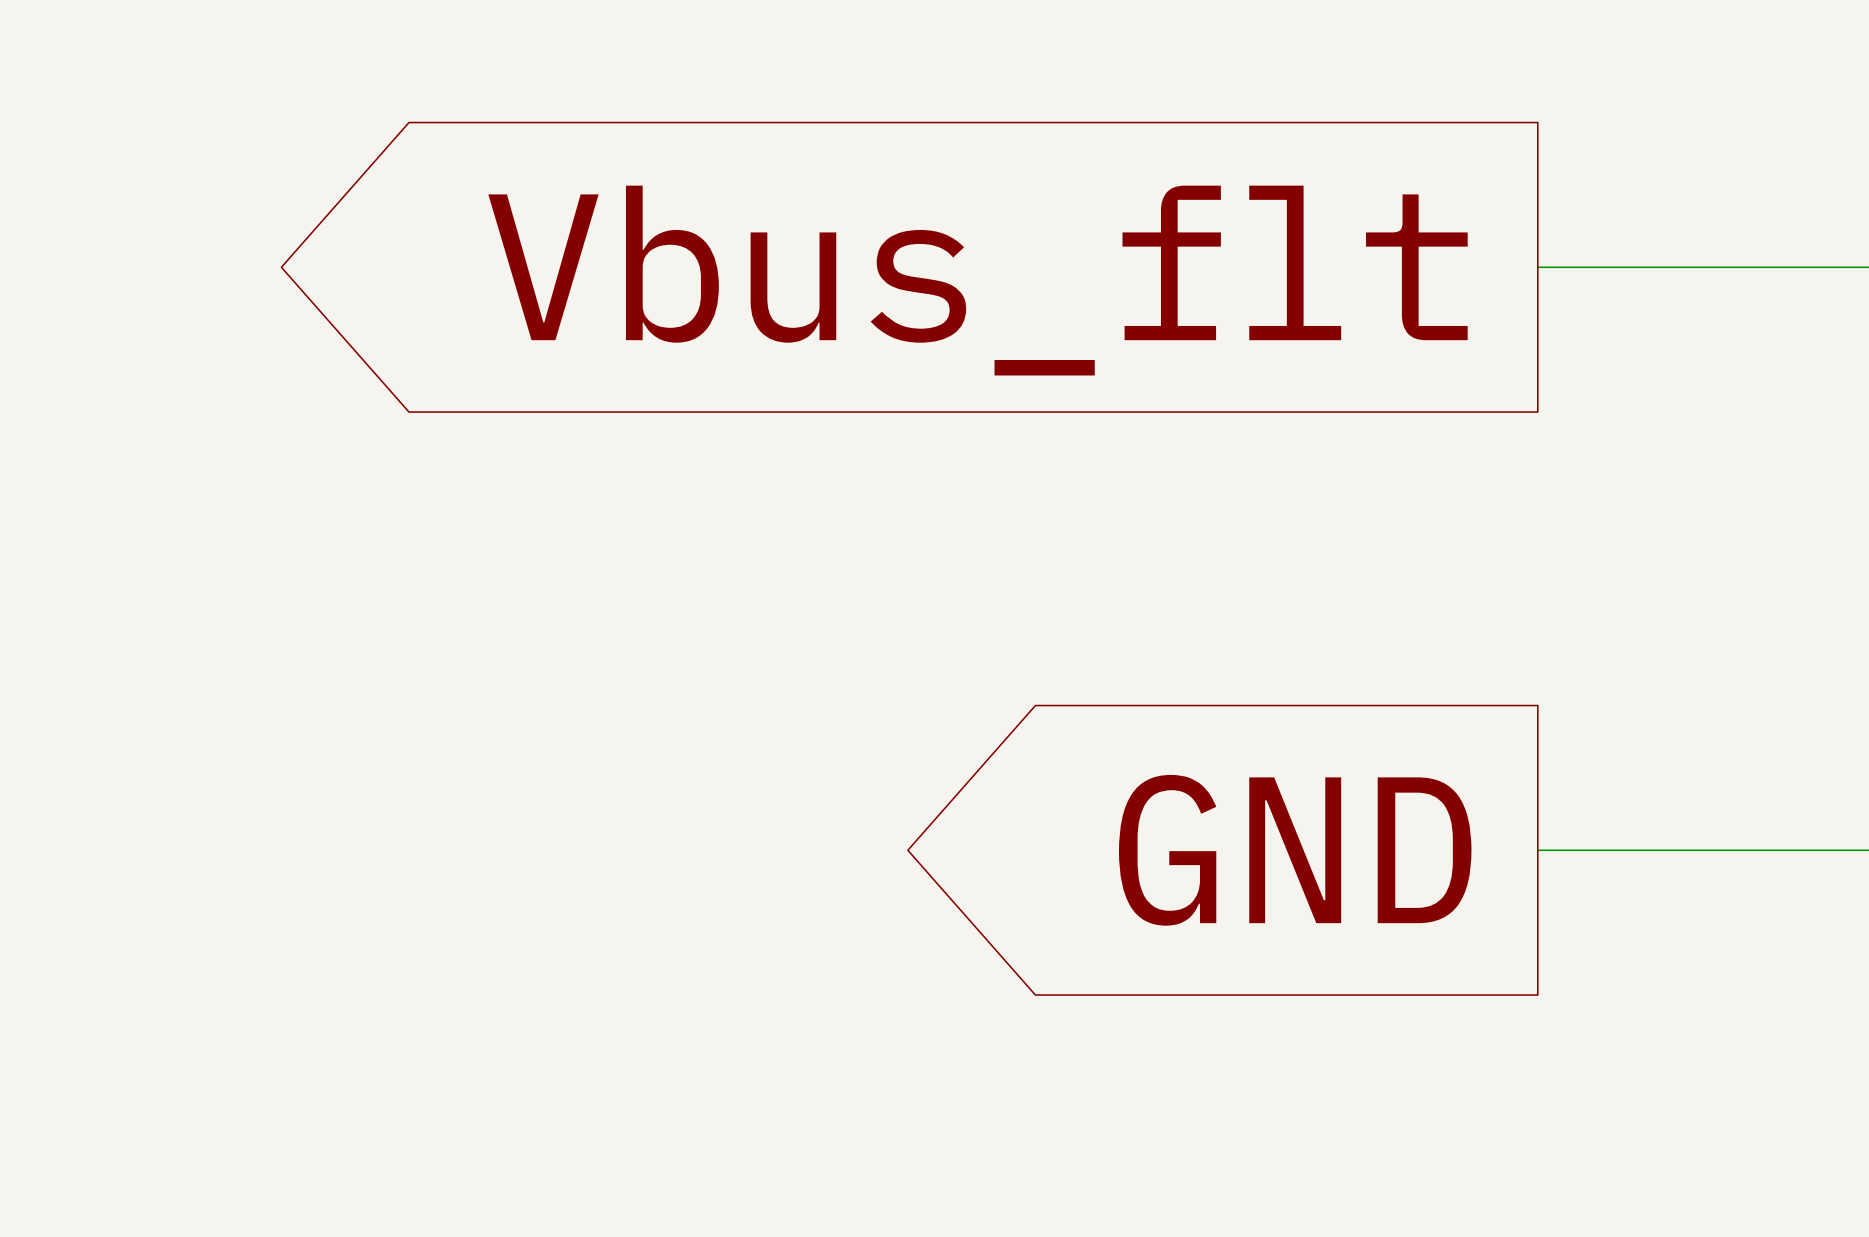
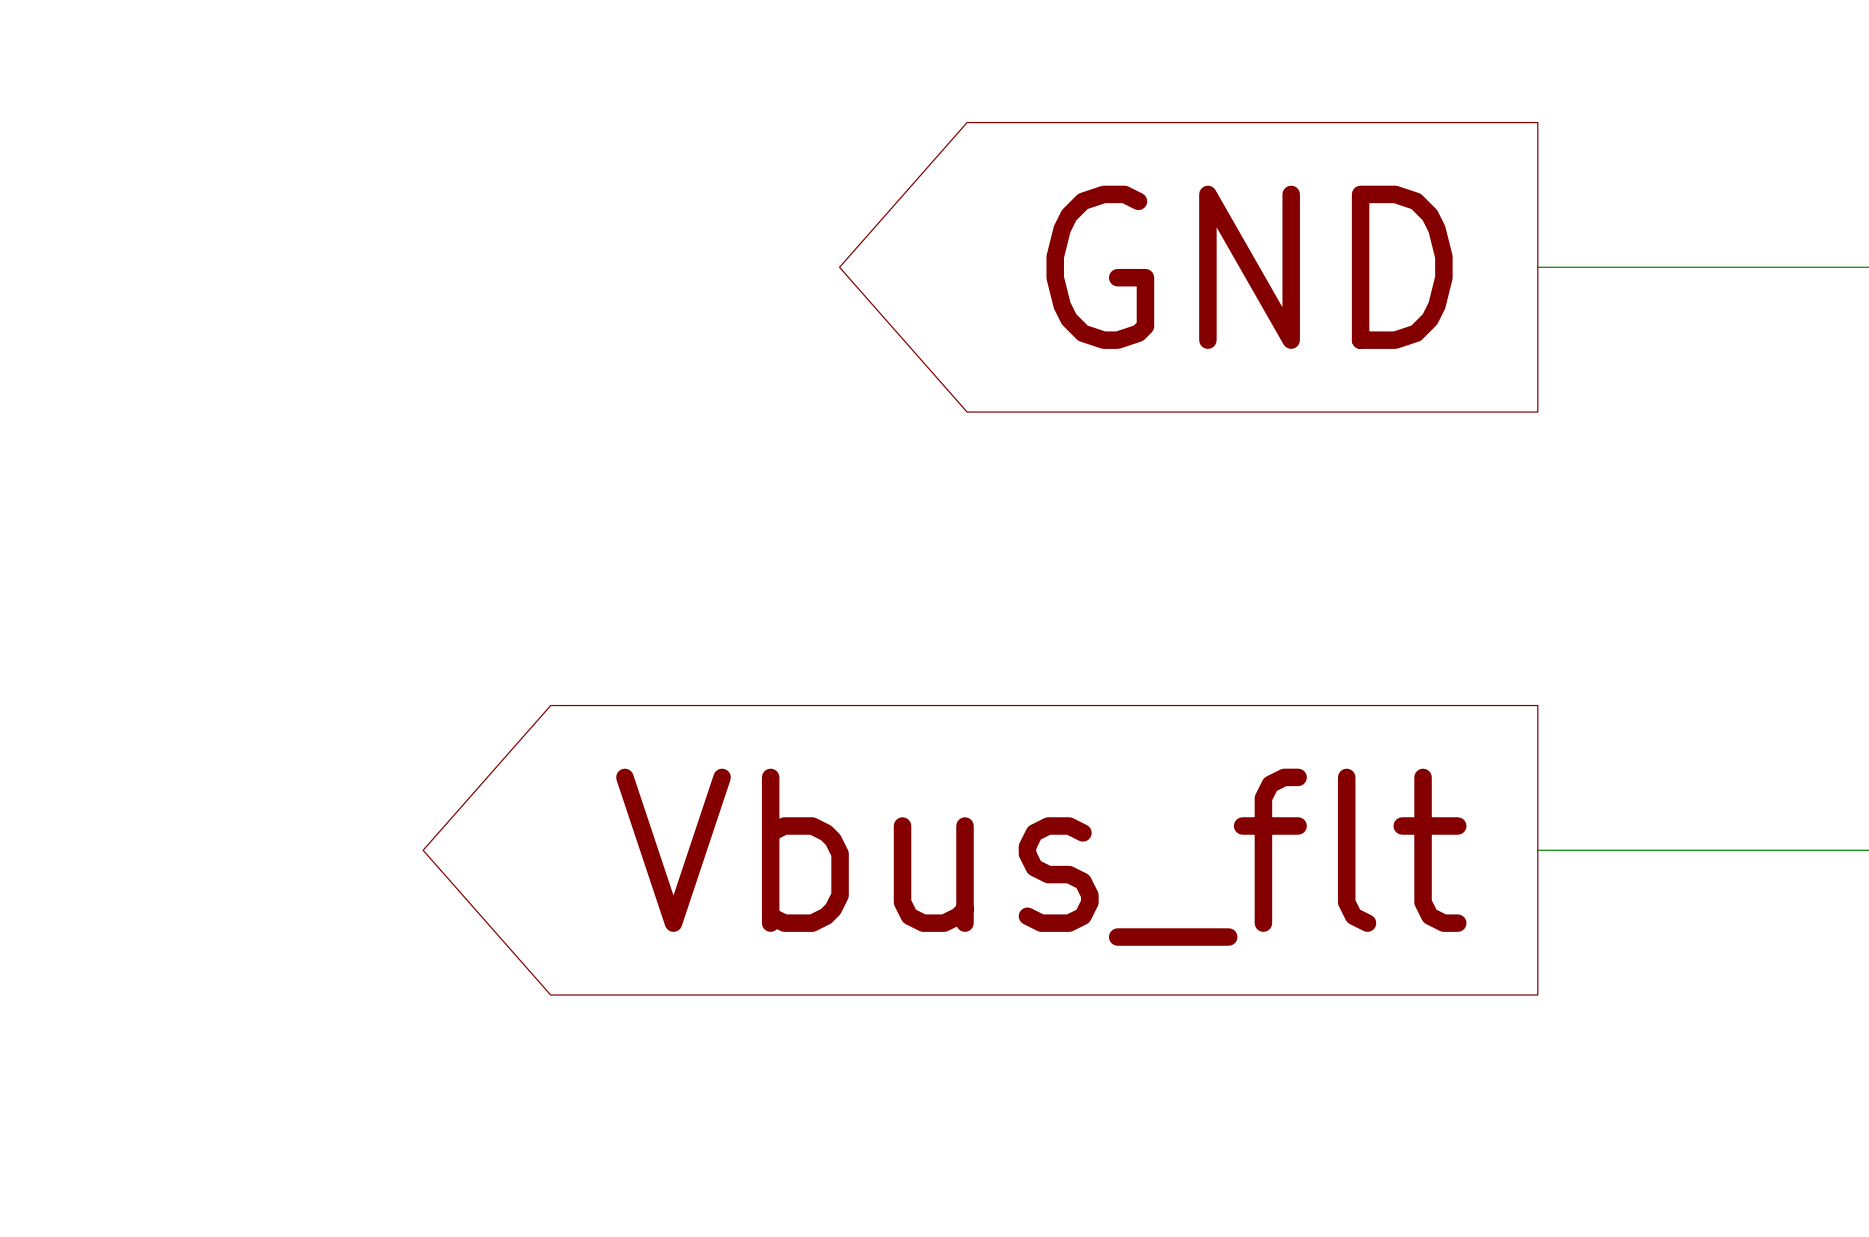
global label: Vbus_flt (978, 280) -> GND (1249, 267)
global label: GND (1295, 850) -> Vbus_flt (1041, 857)

